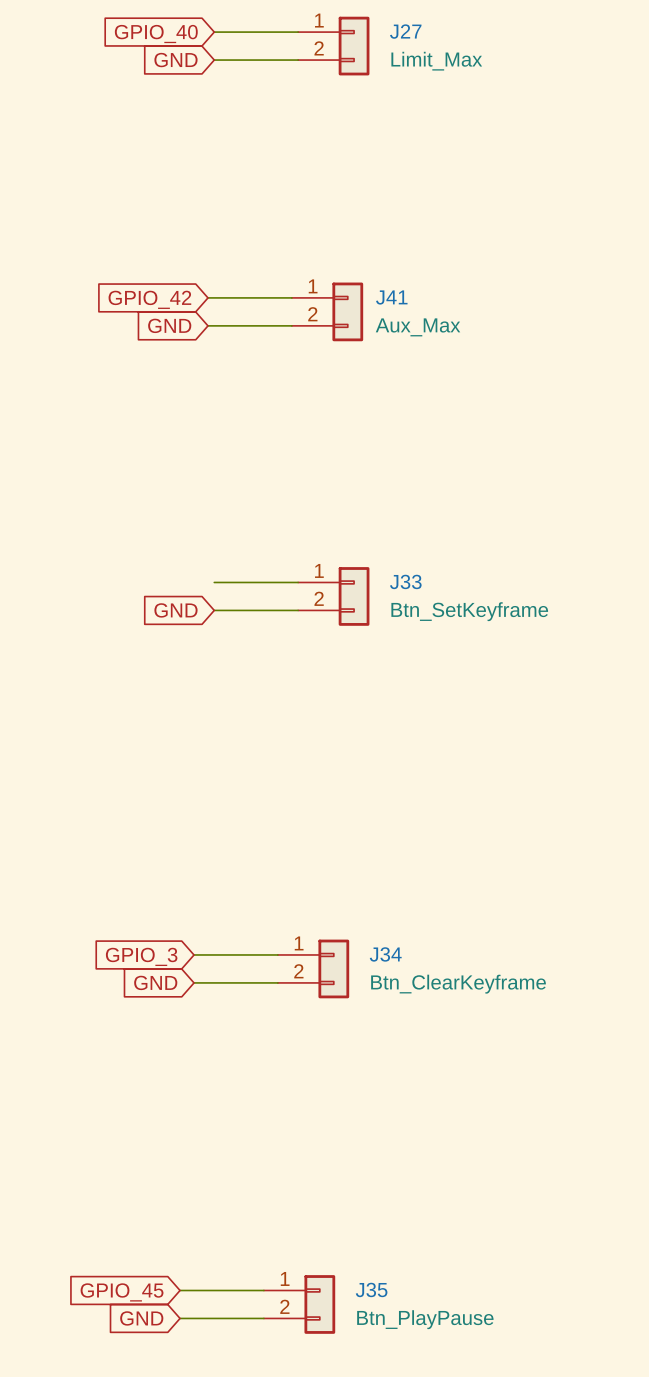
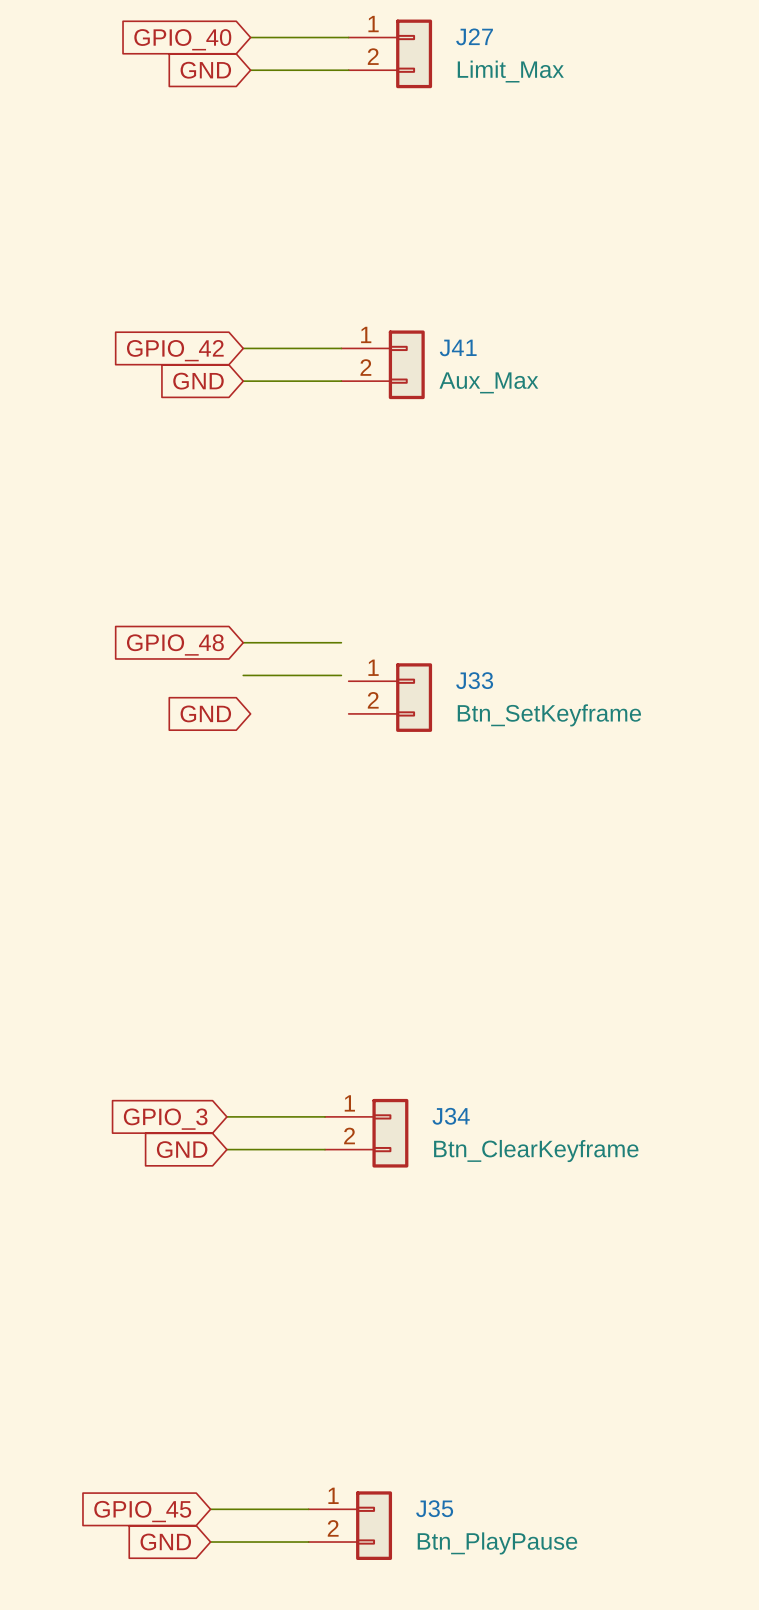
global label: none -> GPIO_48 (175, 644)
wire: (214, 582) (298, 582) -> (243, 642) (341, 642)
wire: (214, 610) (298, 610) -> (243, 675) (341, 675)

